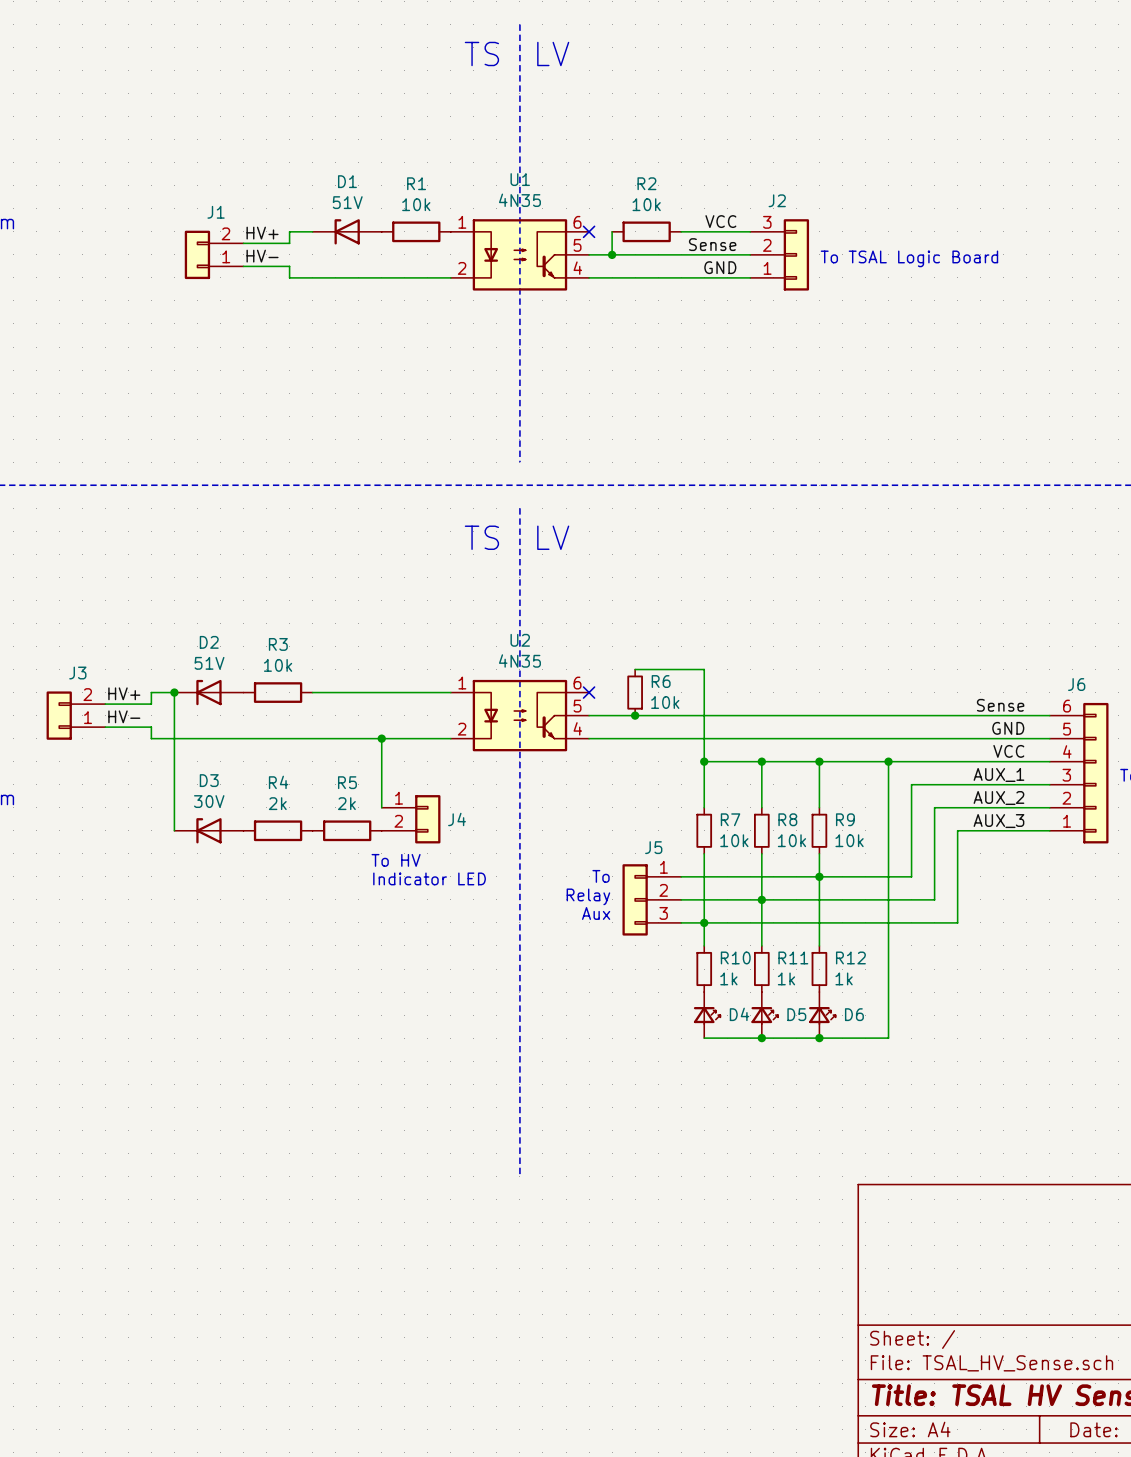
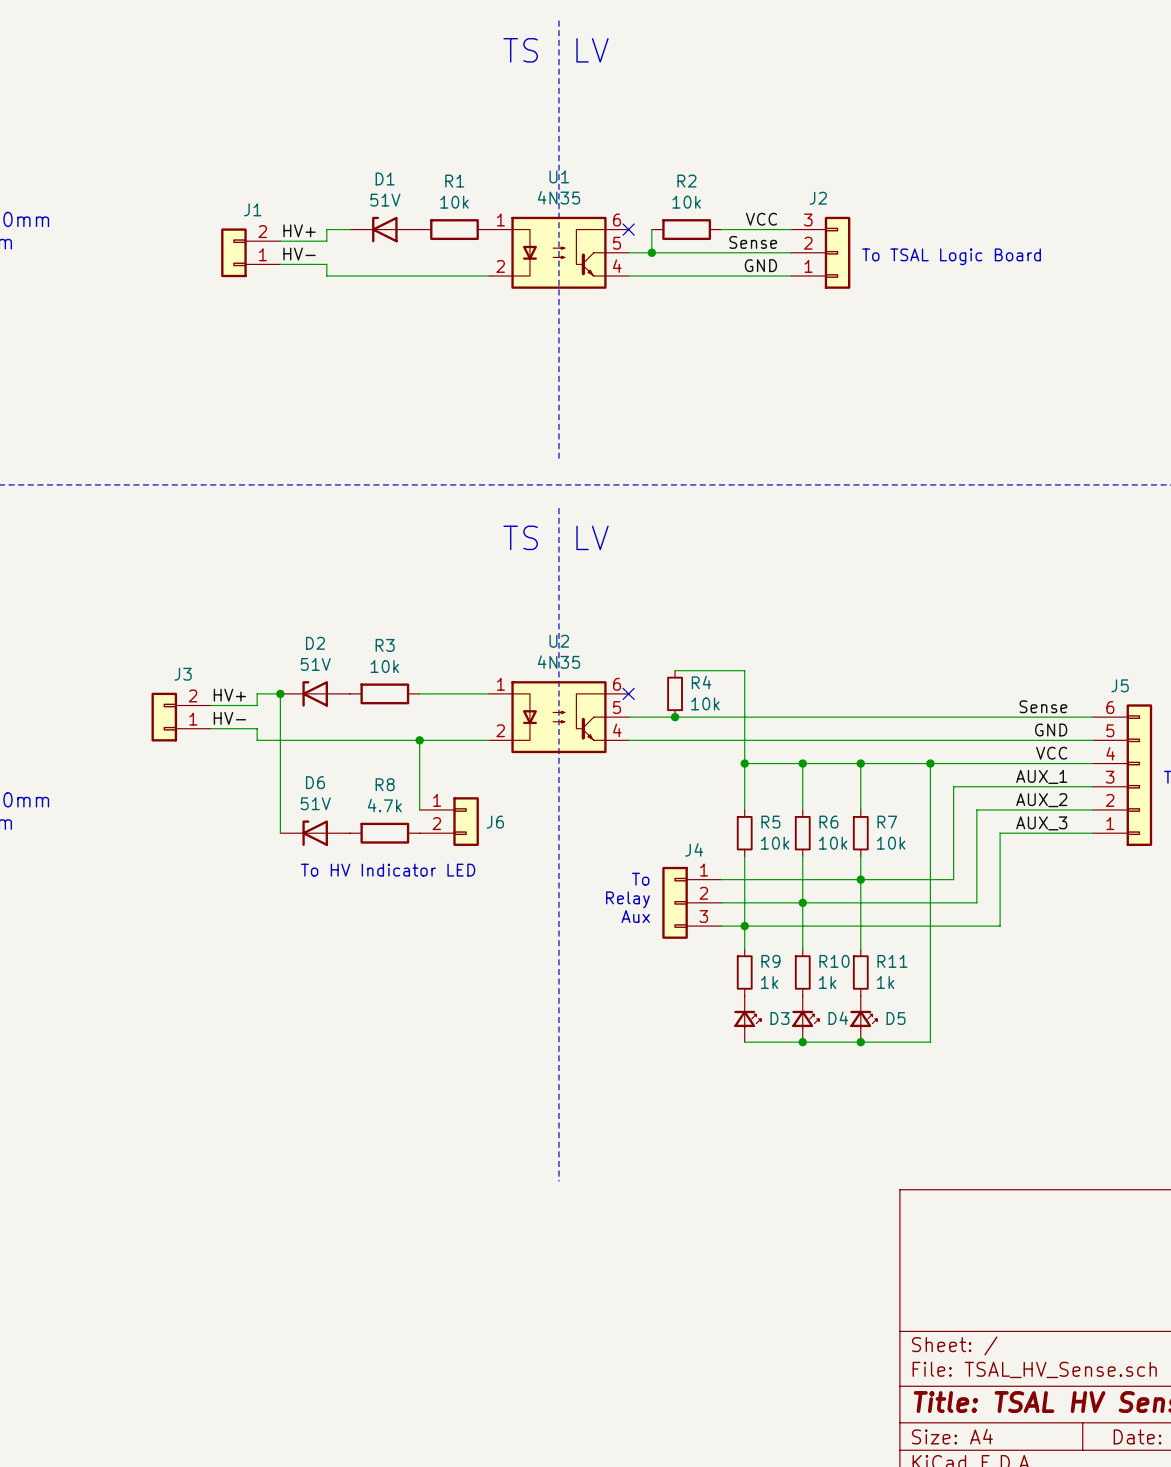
R6 name: R6 (661, 681) -> R4 (701, 682)
J6 name: J6 (1076, 684) -> J5 (1120, 685)
junction: (174, 692) -> none
D2 position: (208, 692) -> (315, 693)
junction: none -> (280, 693)
R3 position: (278, 692) -> (384, 693)
wire: (312, 692) (381, 692) -> none
label position: HV+ (124, 693) -> HV+ (229, 695)
wire: (105, 704) (151, 704) (151, 692) (174, 692) (174, 830) -> (210, 705) (257, 705) (257, 693) (280, 693) (280, 833)
J3 position: (75, 715) -> (181, 717)
label position: HV- (124, 716) -> HV- (229, 718)
wire: (105, 727) (151, 727) (151, 738) (220, 738) -> (210, 728) (257, 728) (257, 740)
R5 name: R5 (347, 782) -> R8 (385, 784)
R5 value: 2k (346, 803) -> 4.7k (384, 805)
J4 name: J4 (457, 819) -> J6 (495, 822)
R7 name: R7 (730, 819) -> R5 (770, 822)
R8 name: R8 (787, 819) -> R6 (828, 822)
R9 name: R9 (845, 819) -> R7 (887, 822)
D3: 30V (208, 830) -> none
R4: 2k (278, 830) -> none
D6: none -> 51V (315, 833)
J5 name: J5 (653, 847) -> J4 (694, 849)
text: To HV (396, 860) -> none
text: Indicator LED (429, 878) -> To HV Indicator LED (388, 870)
R10 name: R10 (735, 957) -> R9 (770, 961)
R11 name: R11 (793, 957) -> R10 (834, 961)
R12 name: R12 (850, 957) -> R11 (892, 961)
D4 name: D4 (739, 1014) -> D3 (779, 1018)
D5 name: D5 (796, 1014) -> D4 (838, 1018)
D6 name: D6 (854, 1014) -> D5 (896, 1018)

